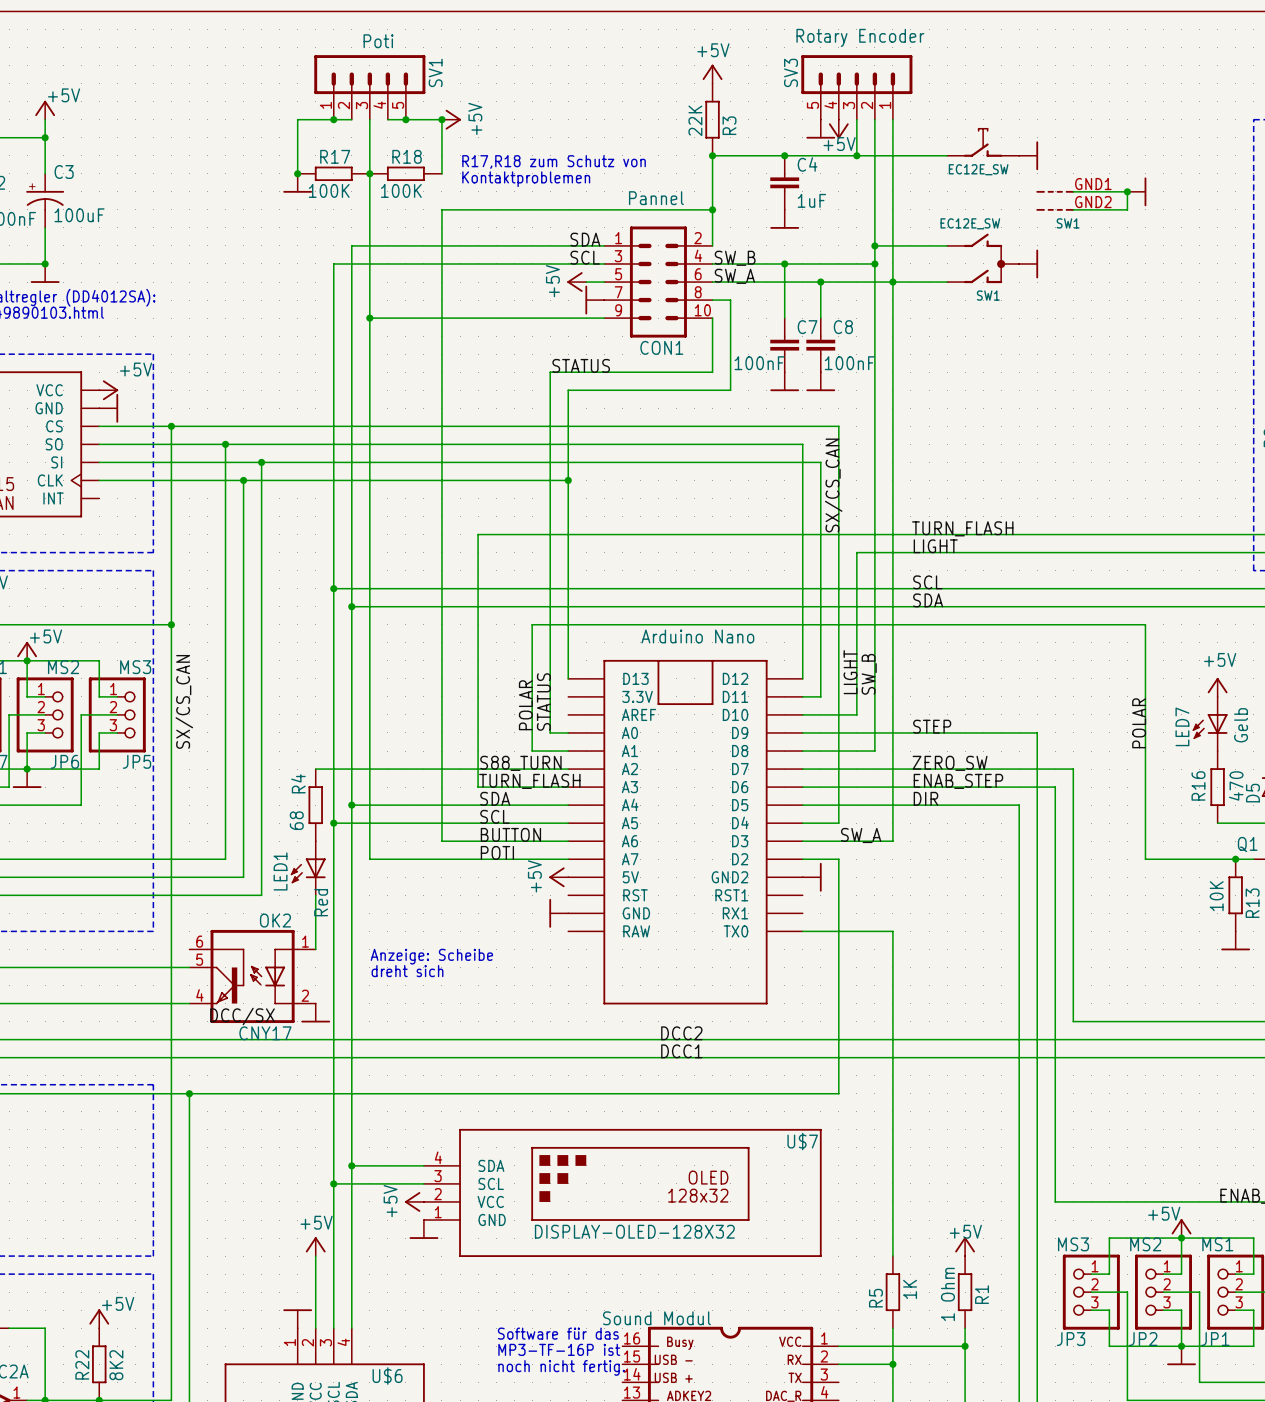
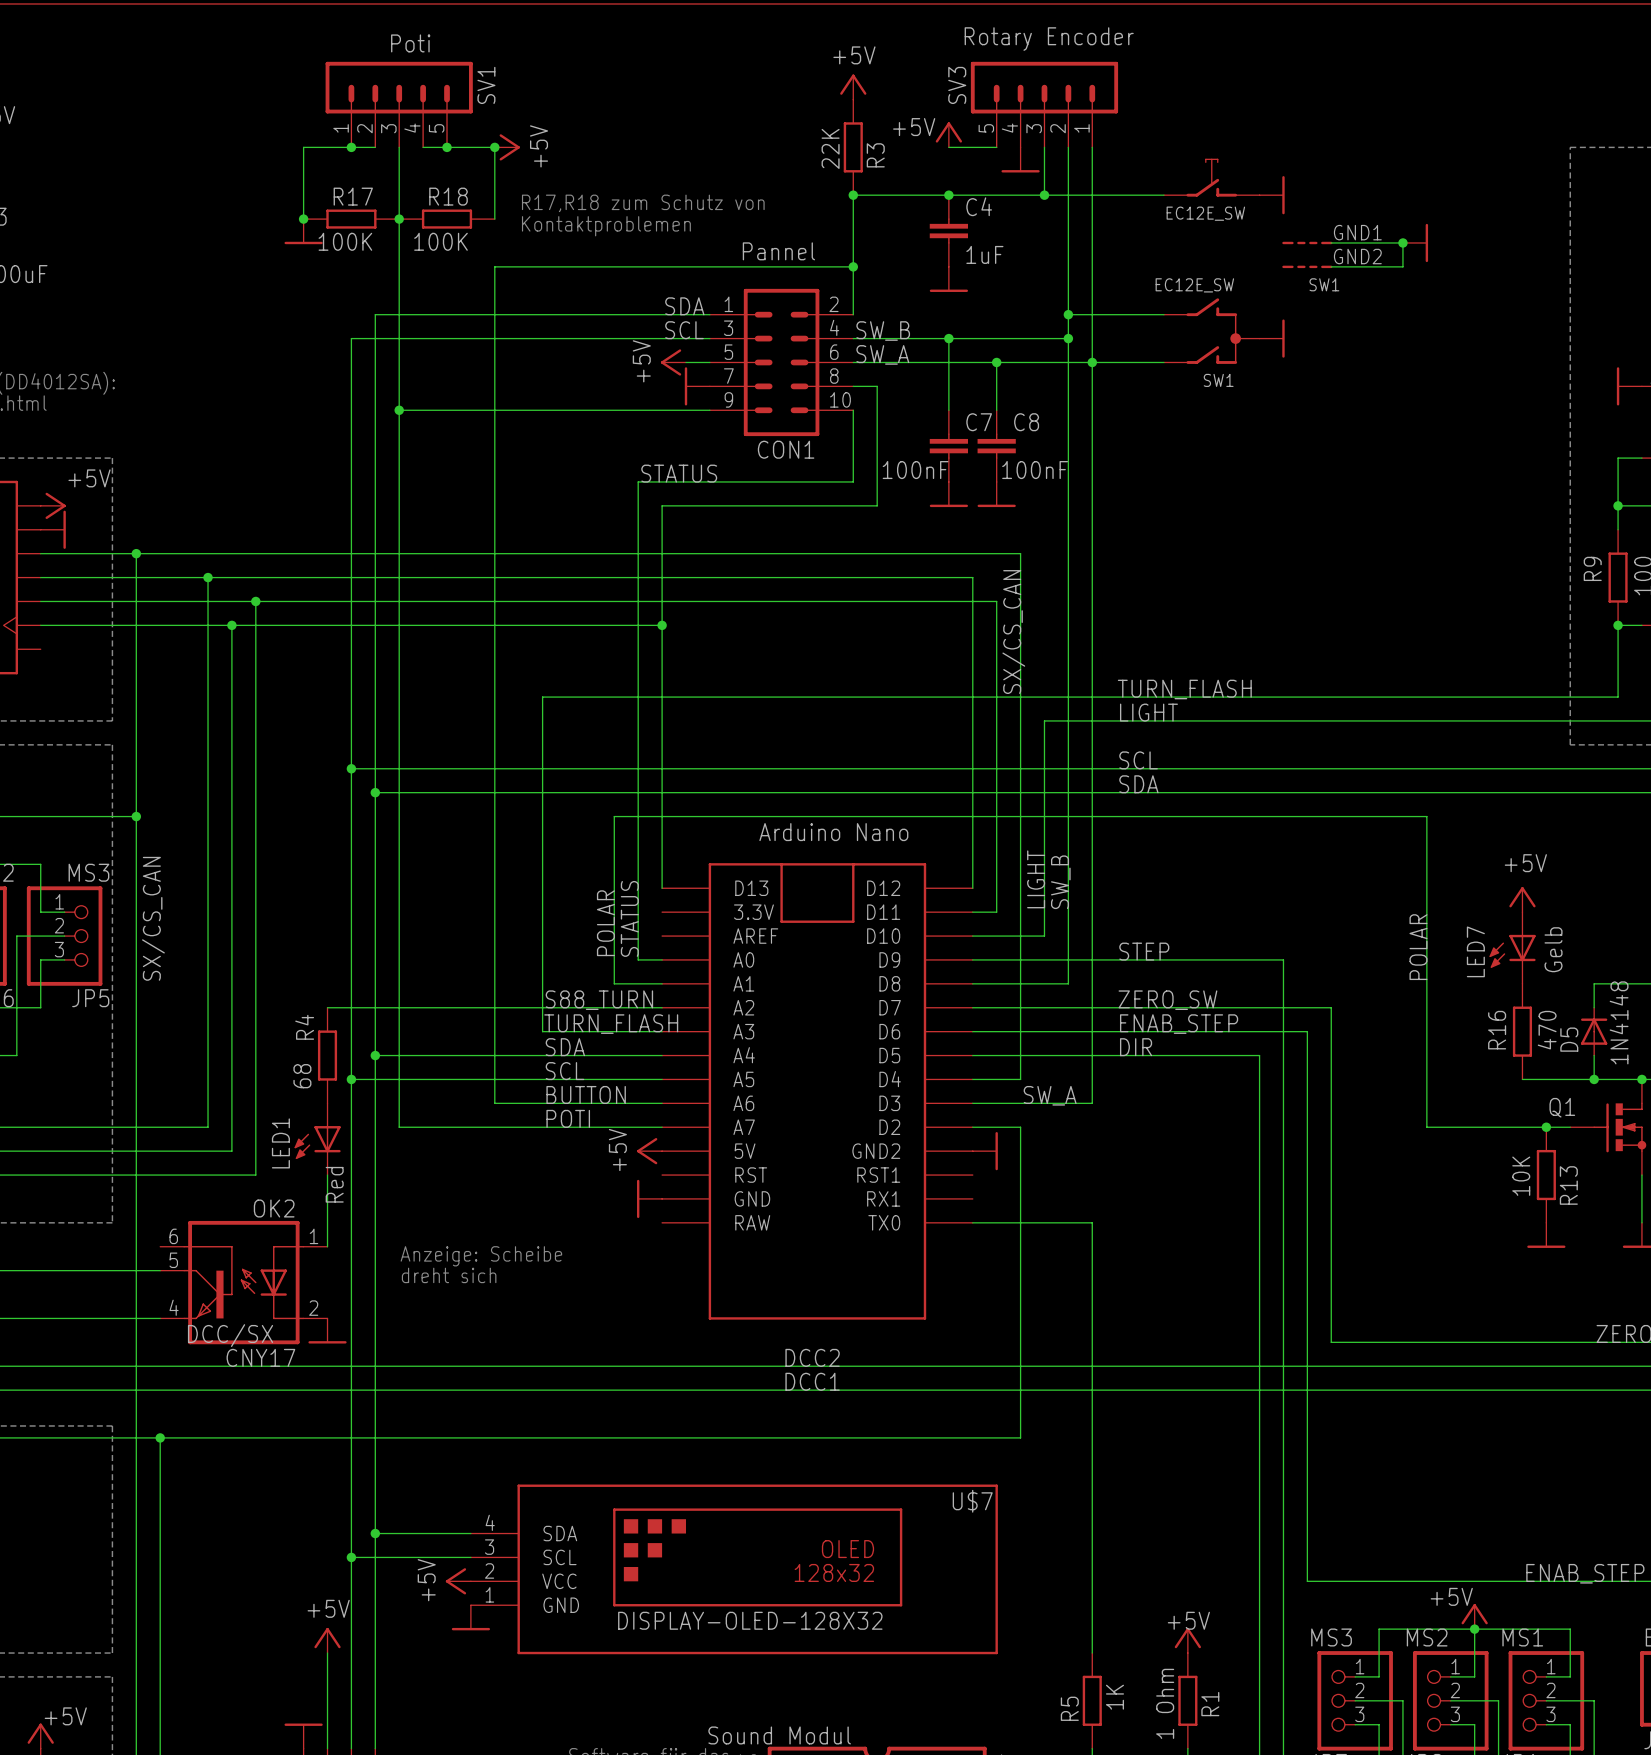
power symbol: none -> +5V (948, 134)
wire: none -> (948, 147) (996, 147)
power symbol shape: [828, 119, 849, 139] -> [1001, 147, 1040, 173]
power symbol: (820, 129) -> none
power symbol text: +5V (839, 144) -> none

